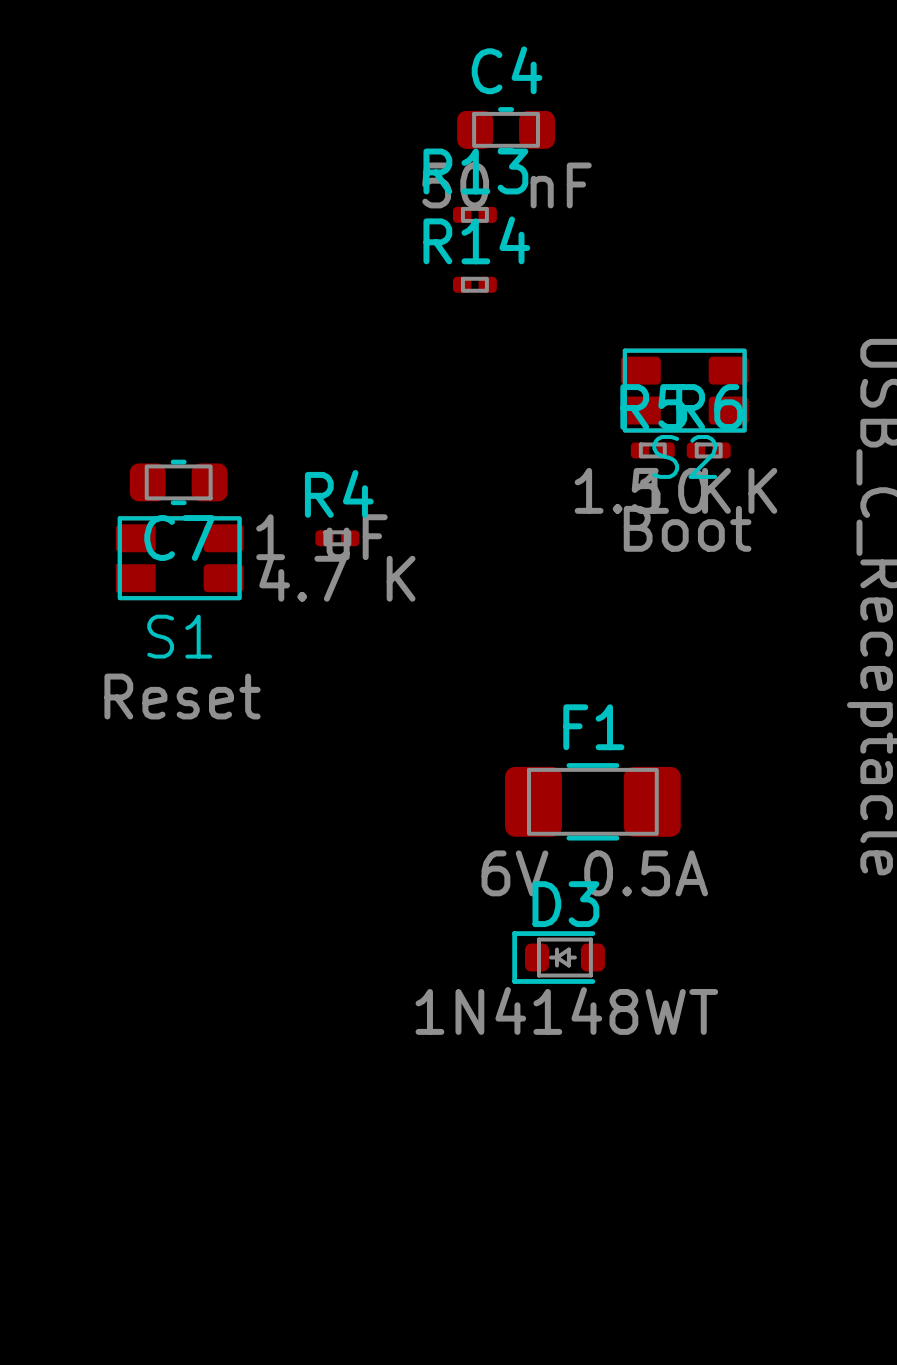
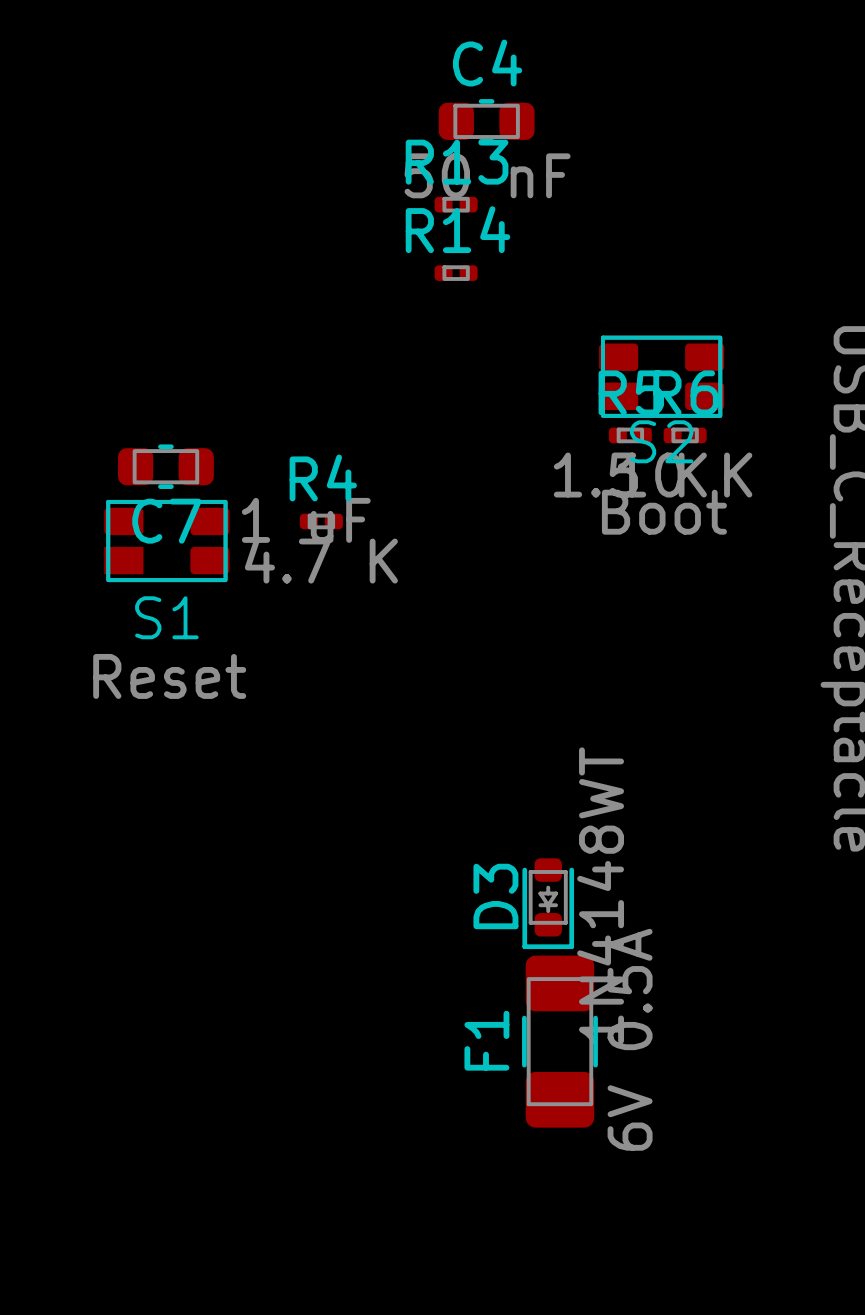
F1 name position: F1 (593, 727) -> F1 (486, 1040)
F1 rotation: 0° (592, 801) -> 90° clockwise (559, 1041)
F1 position: (592, 801) -> (559, 1041)
F1 value position: 6V 0.5A (594, 873) -> 6V 0.5A (630, 1039)
D3 rotation: 0° (558, 957) -> 90° counterclockwise (548, 903)

